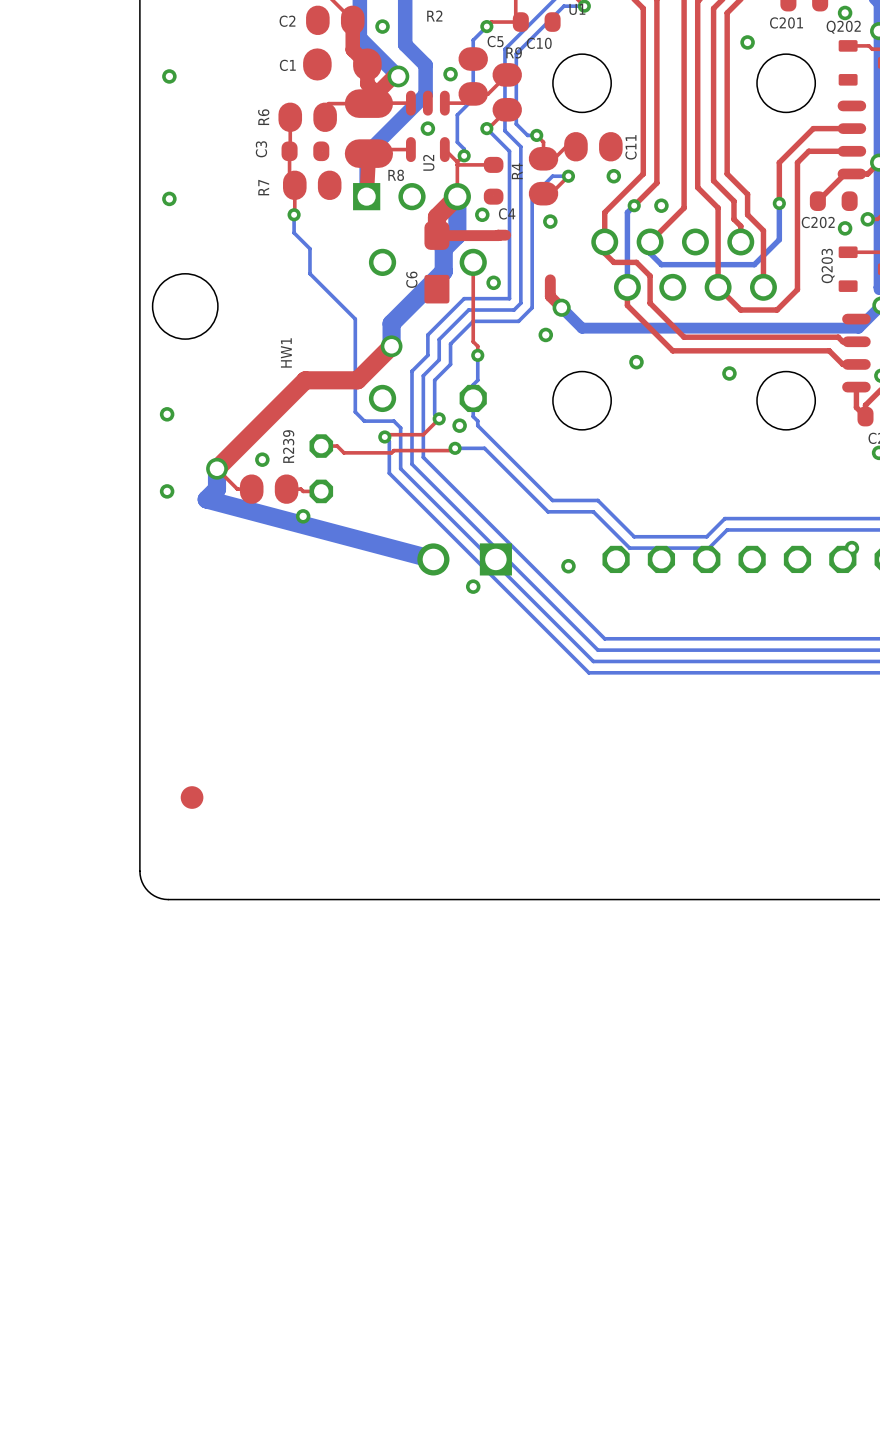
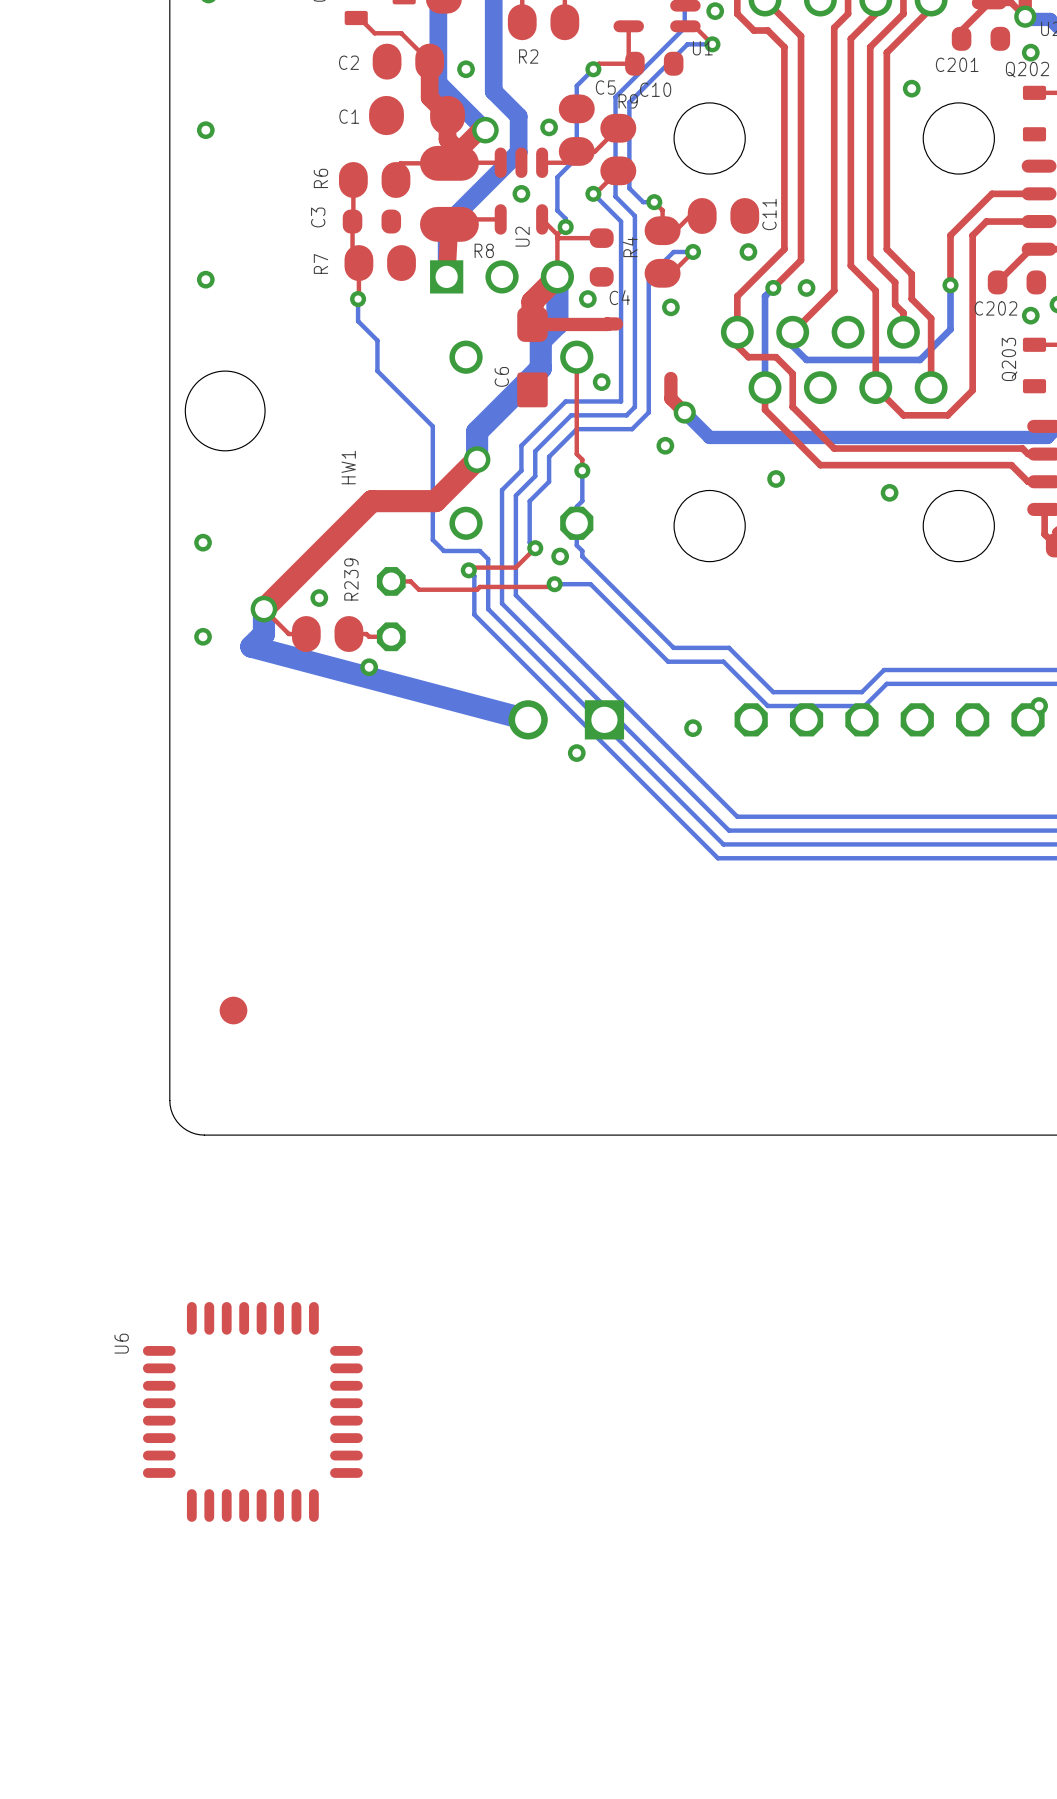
U6: none -> (252, 1411)

